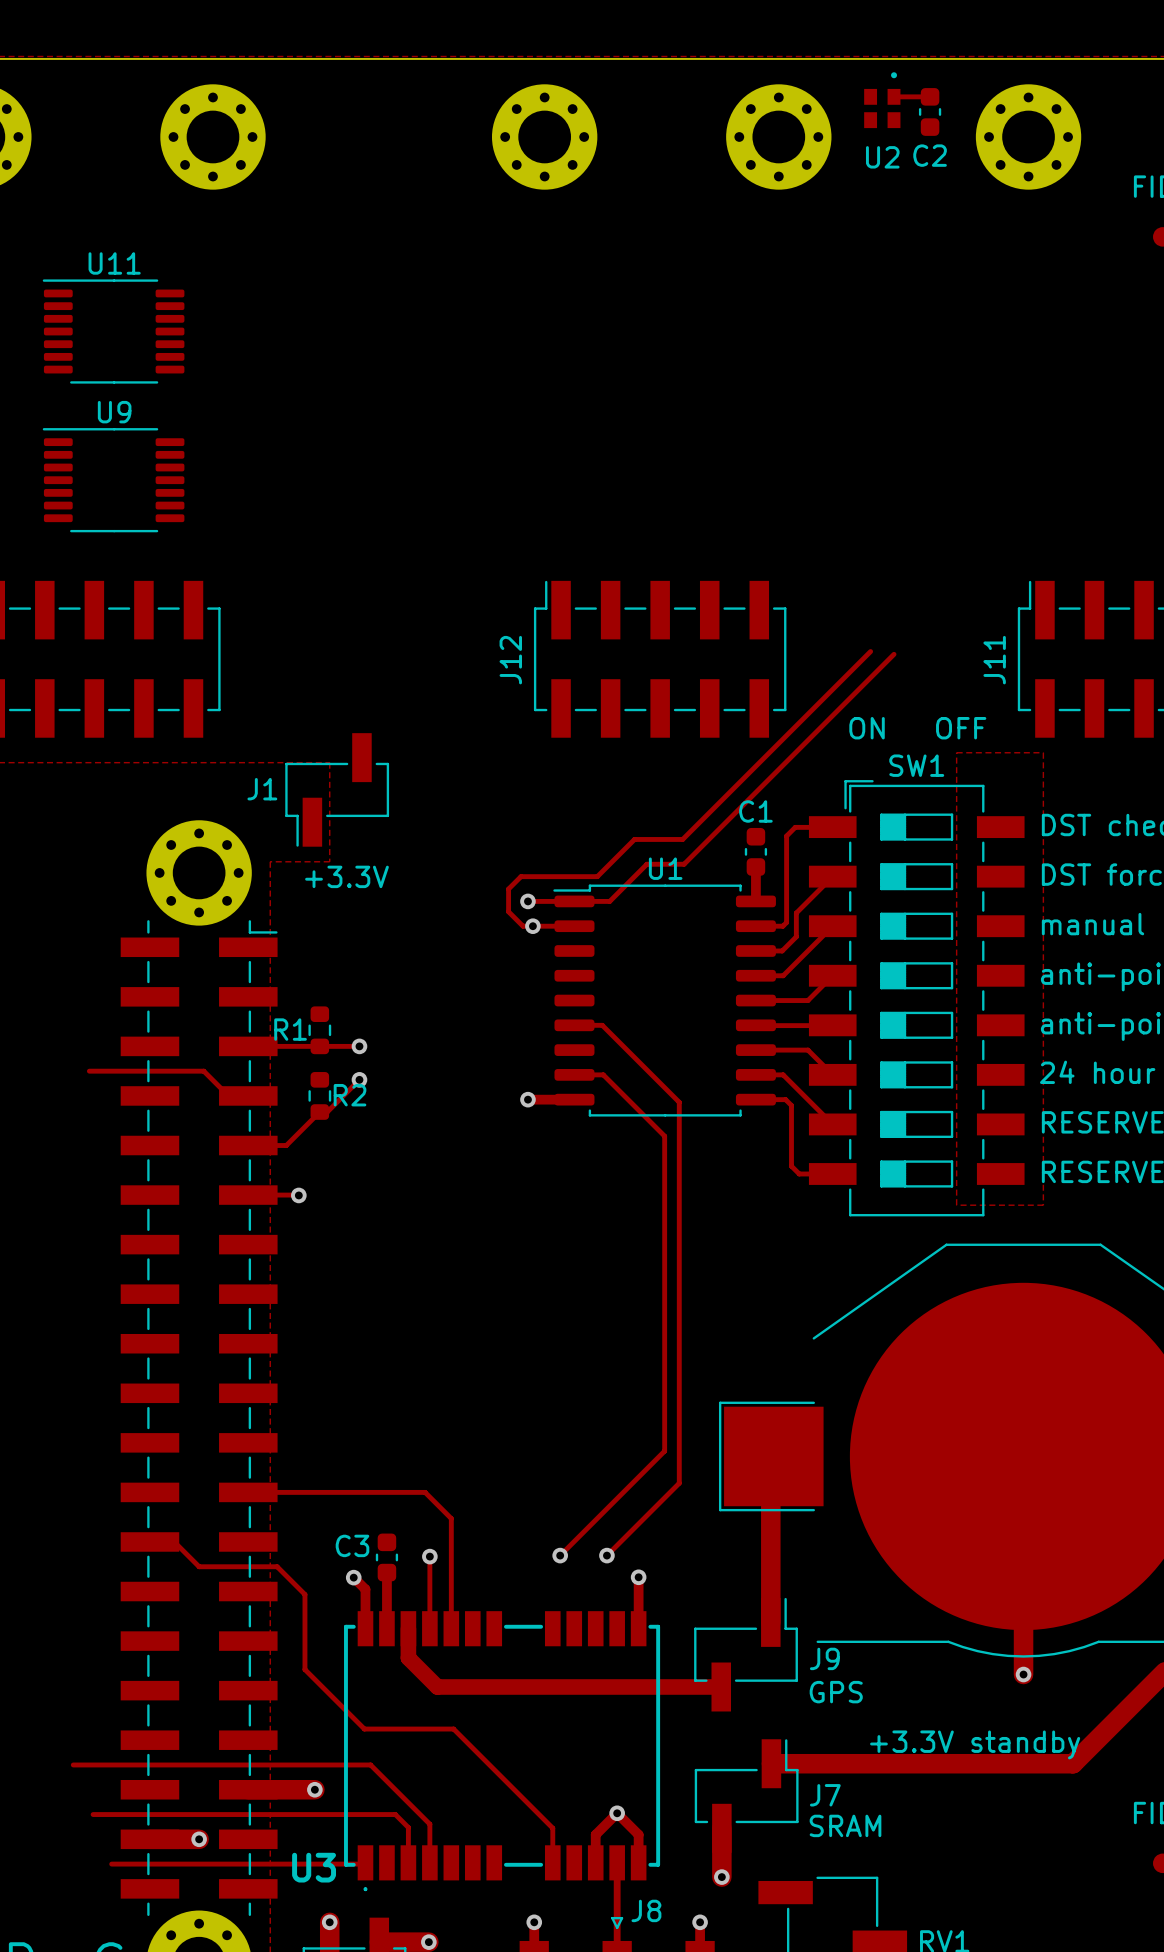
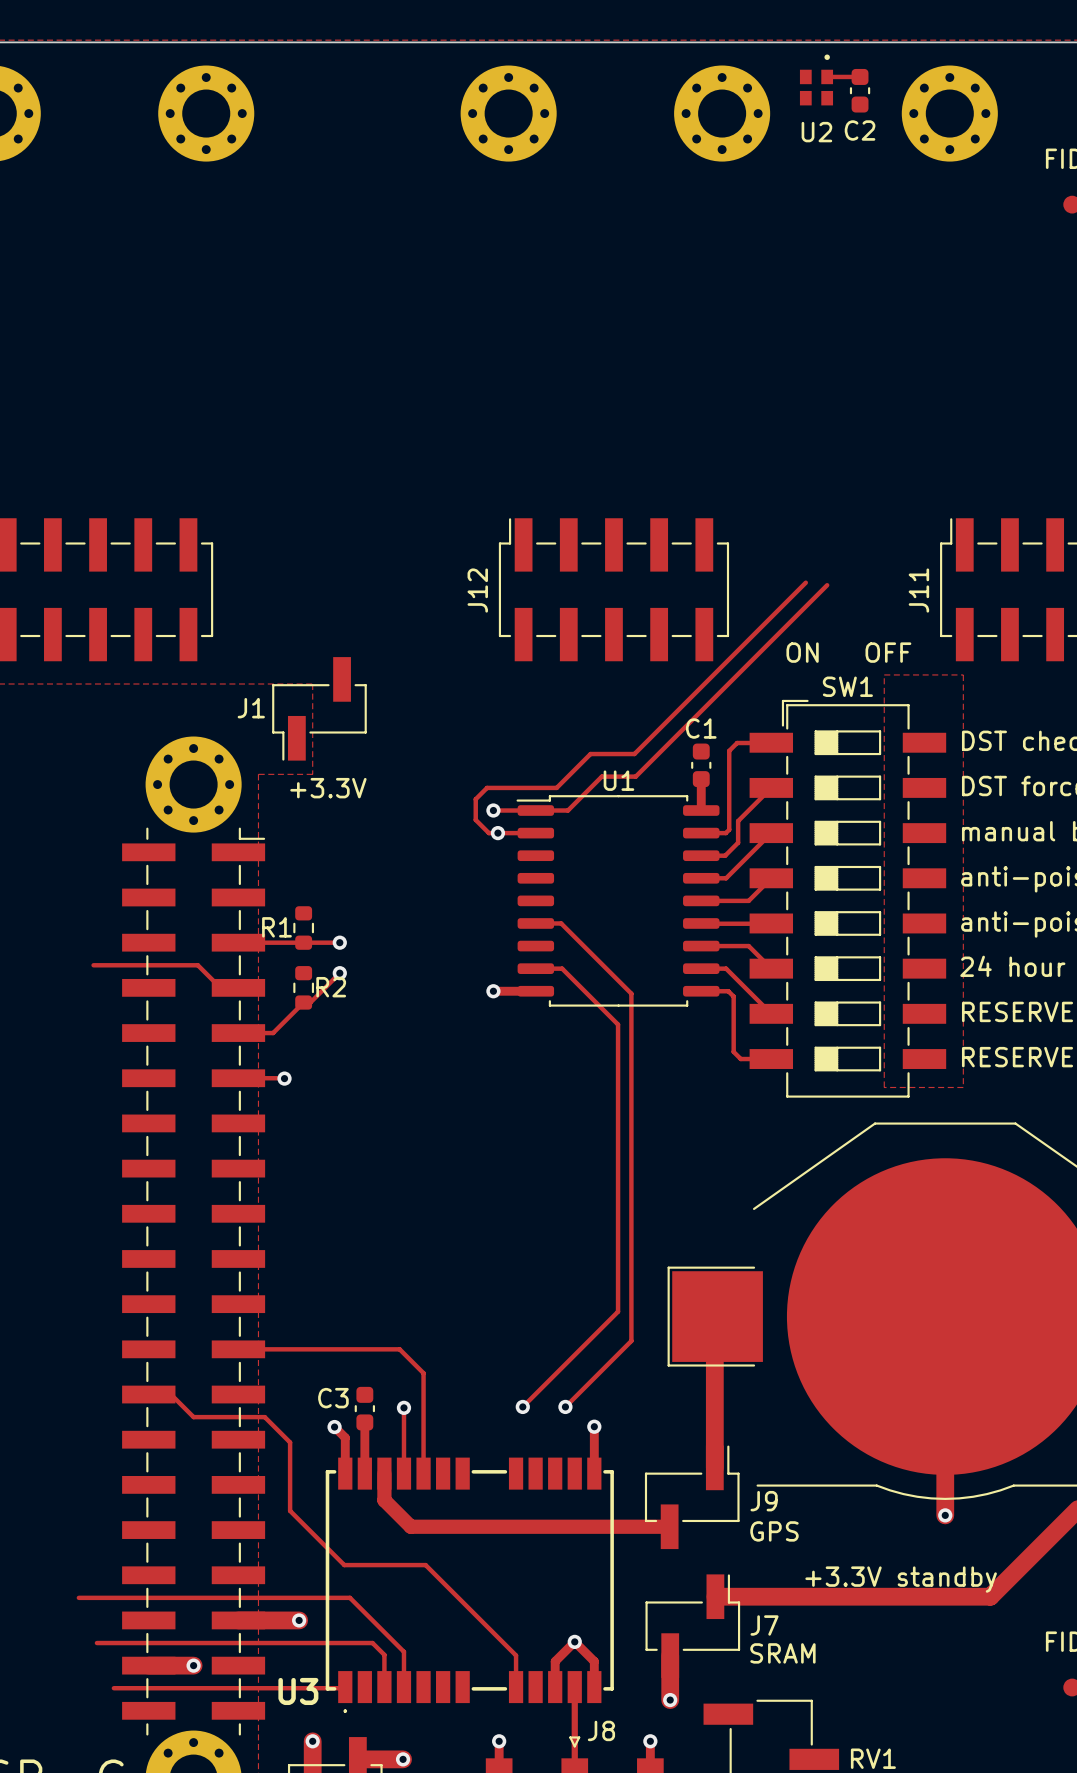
U11: (113, 331) -> none
U9: (113, 480) -> none

